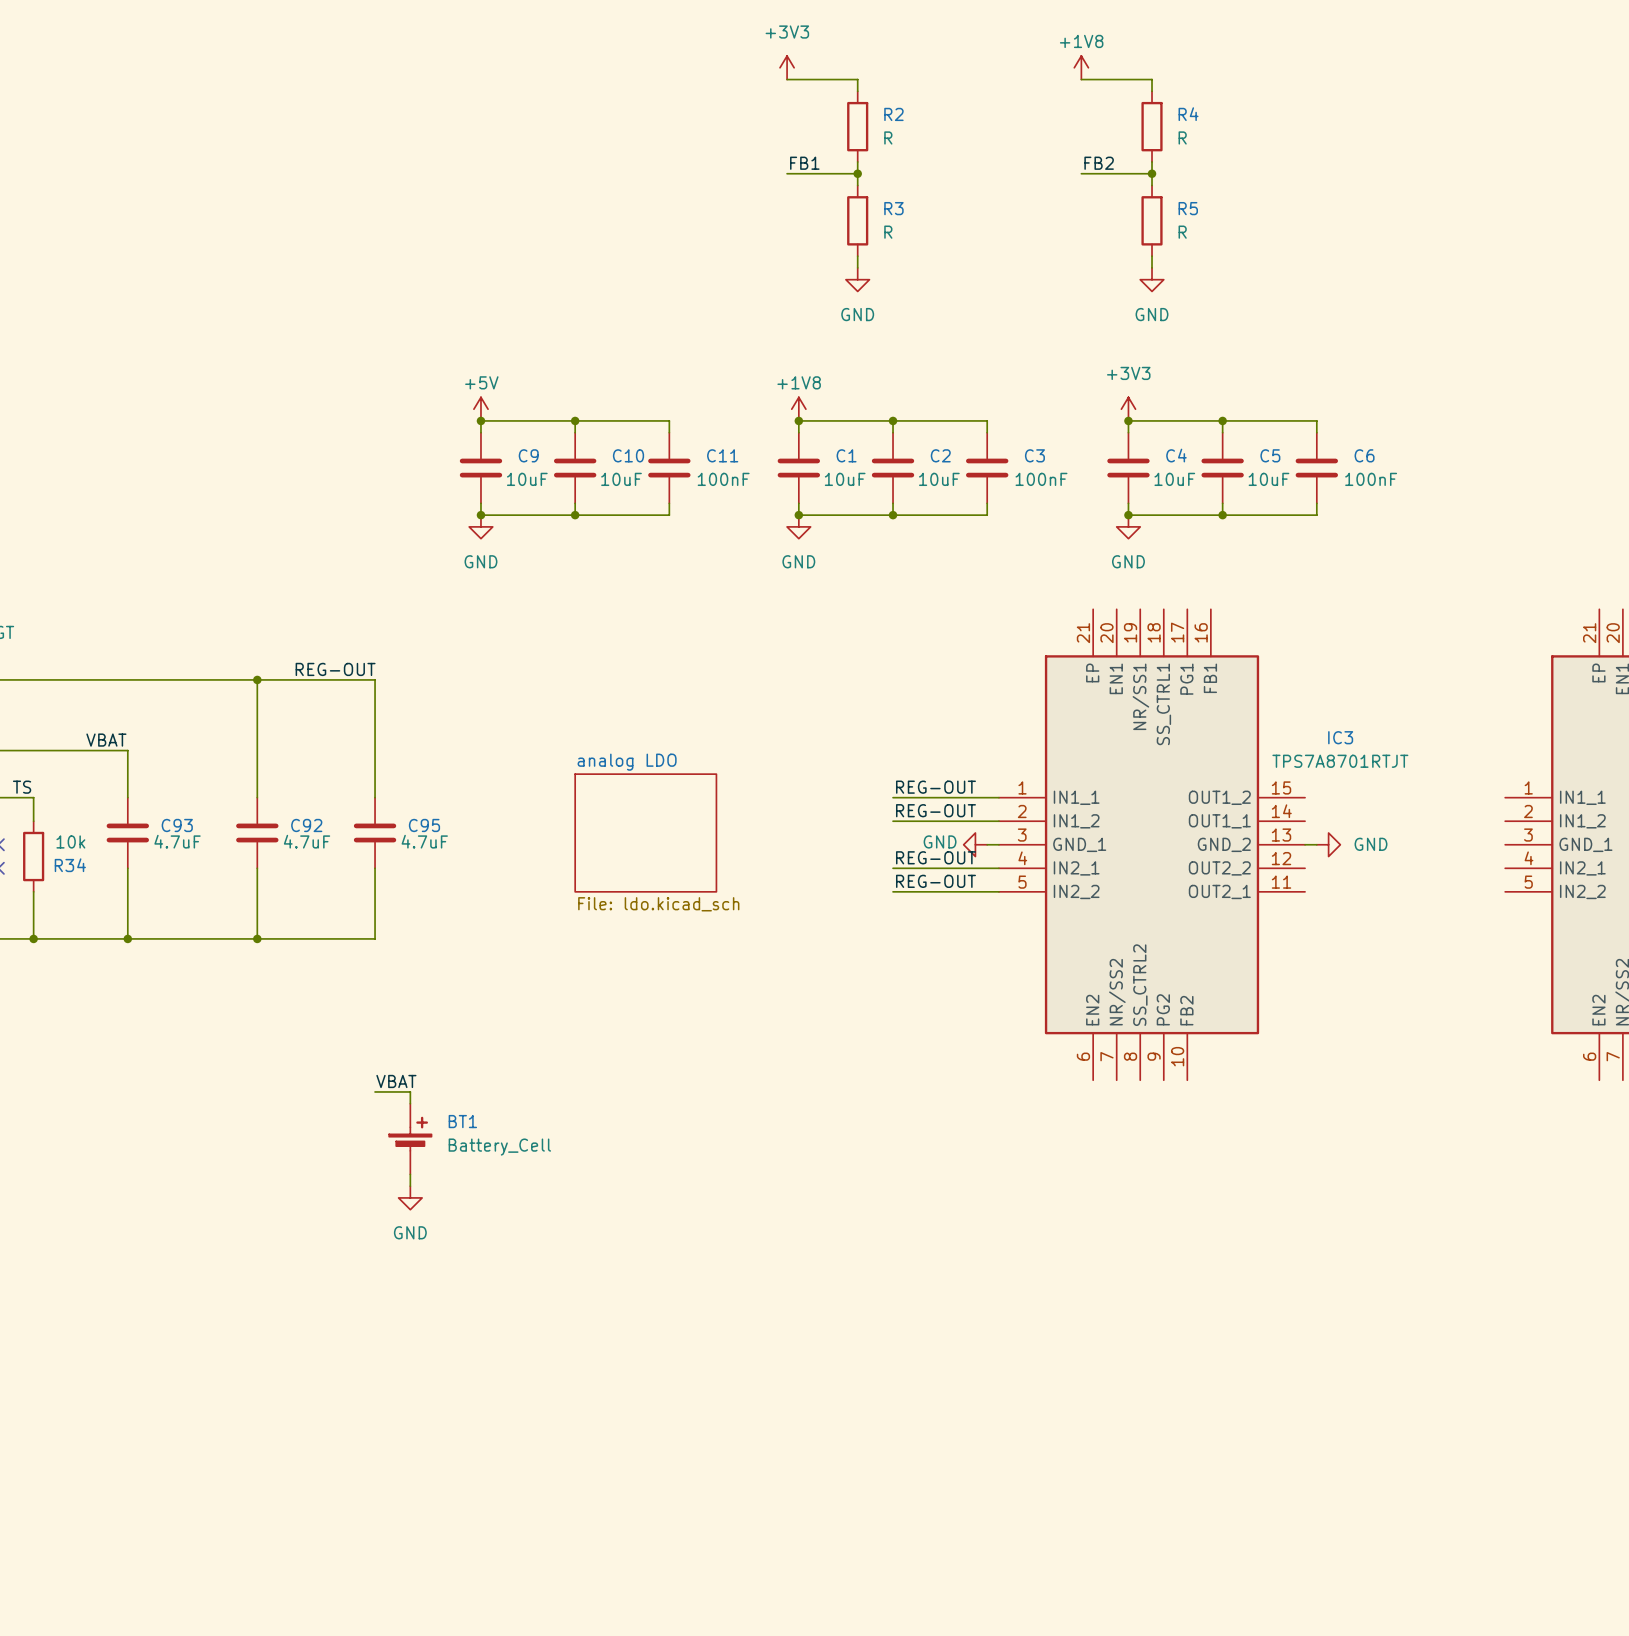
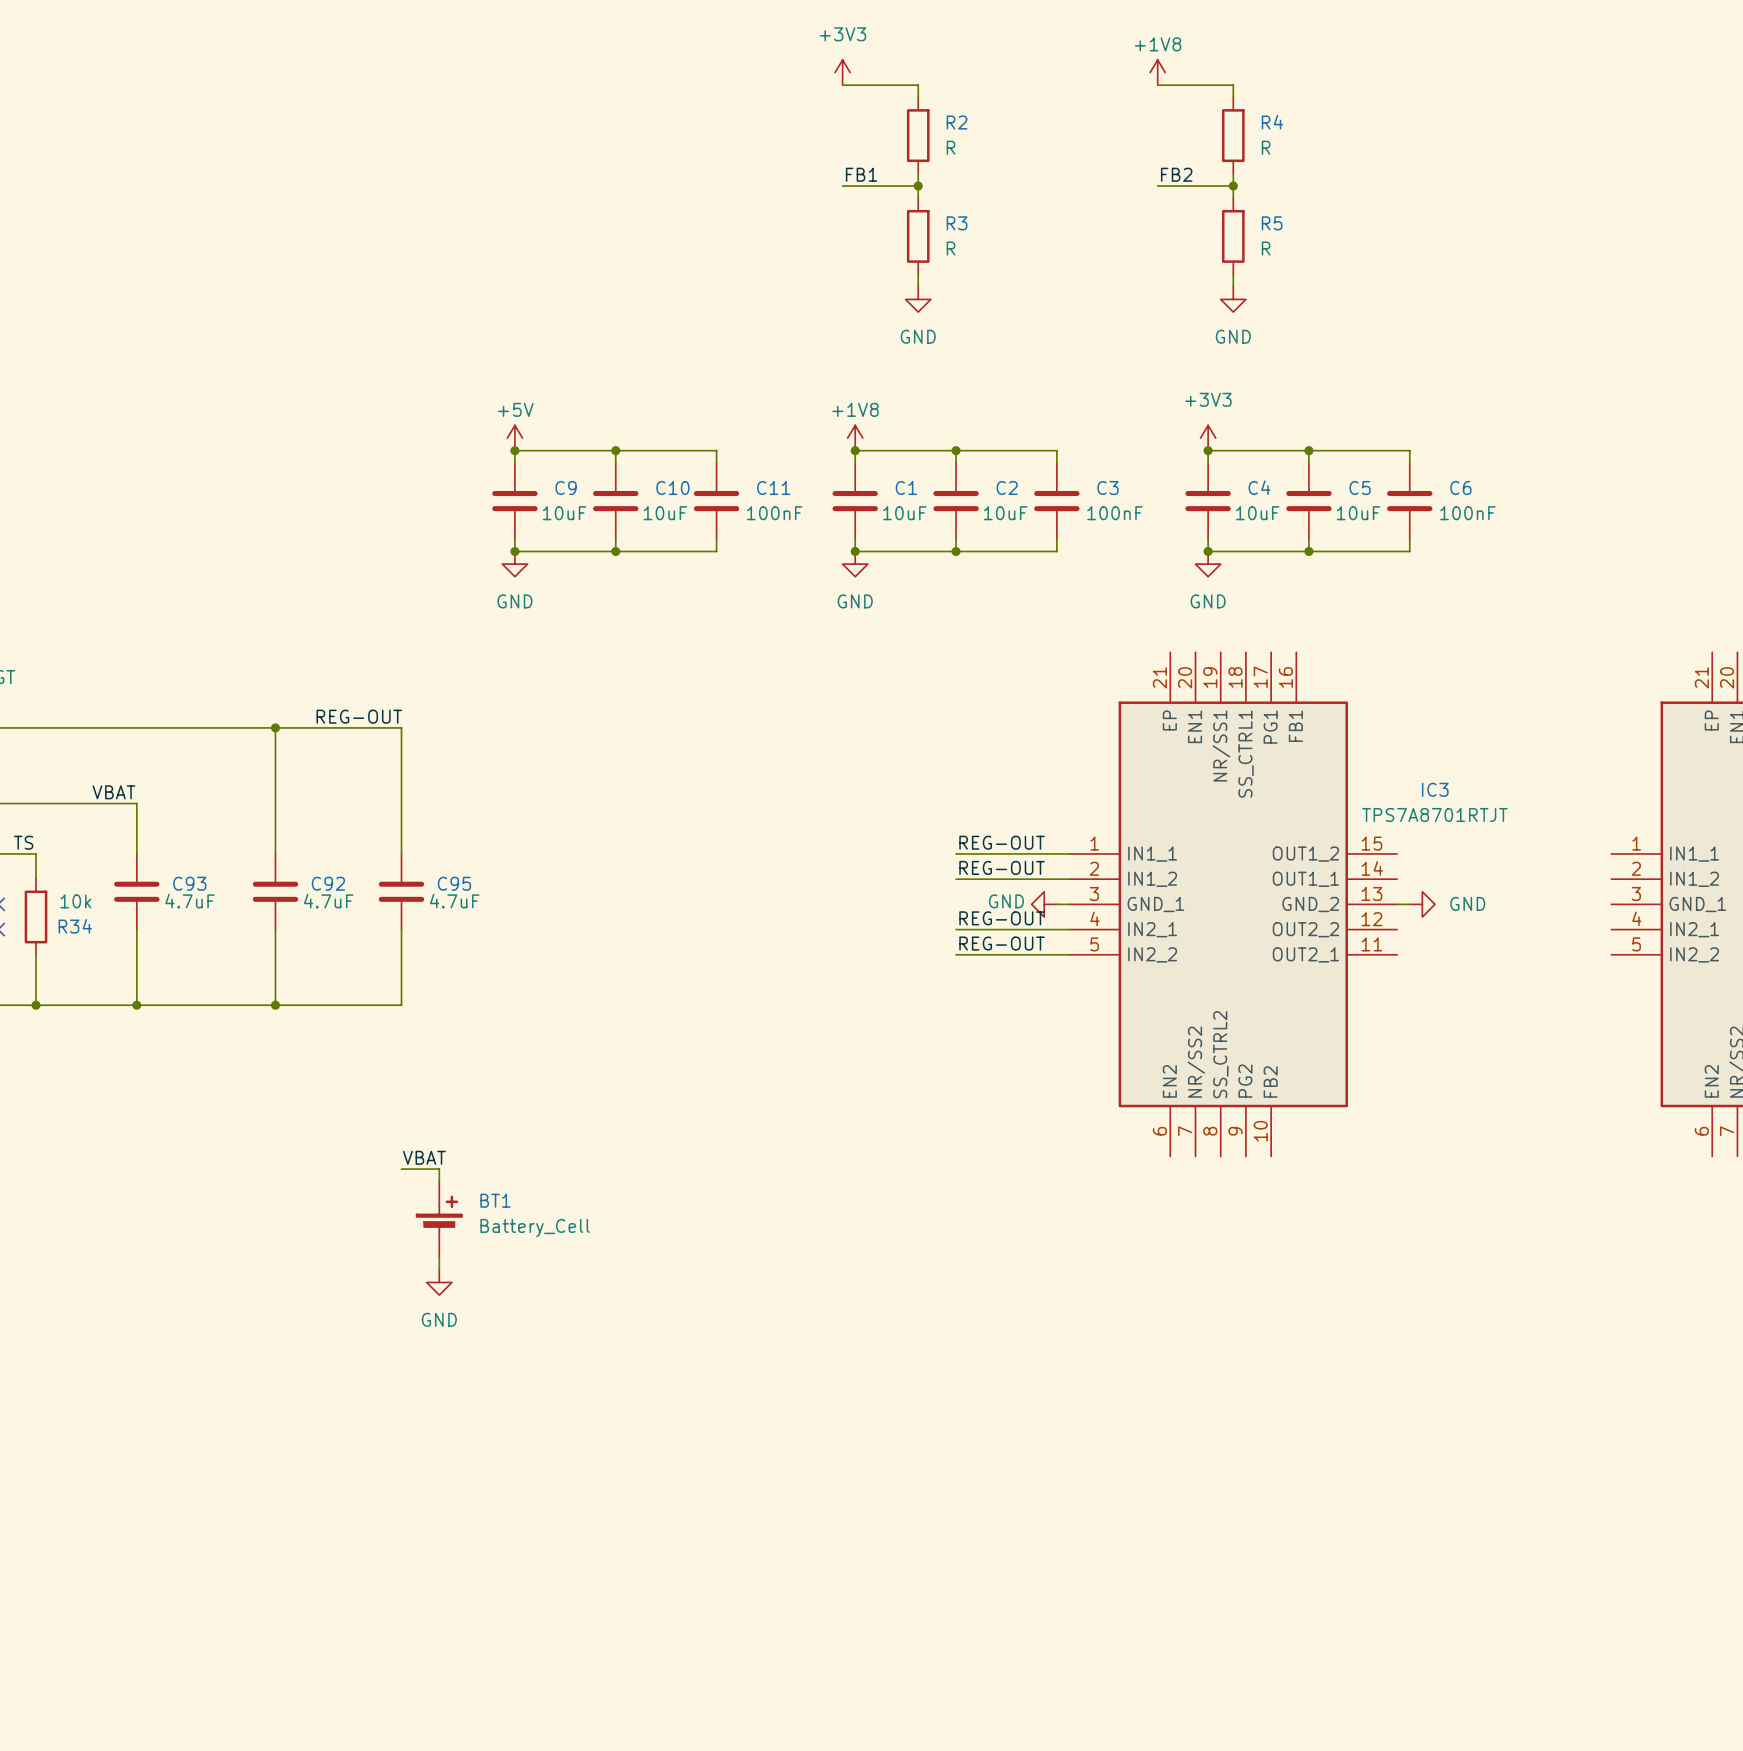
sheet analog LDO: File: ldo.kicad_sch (645, 832) -> none

